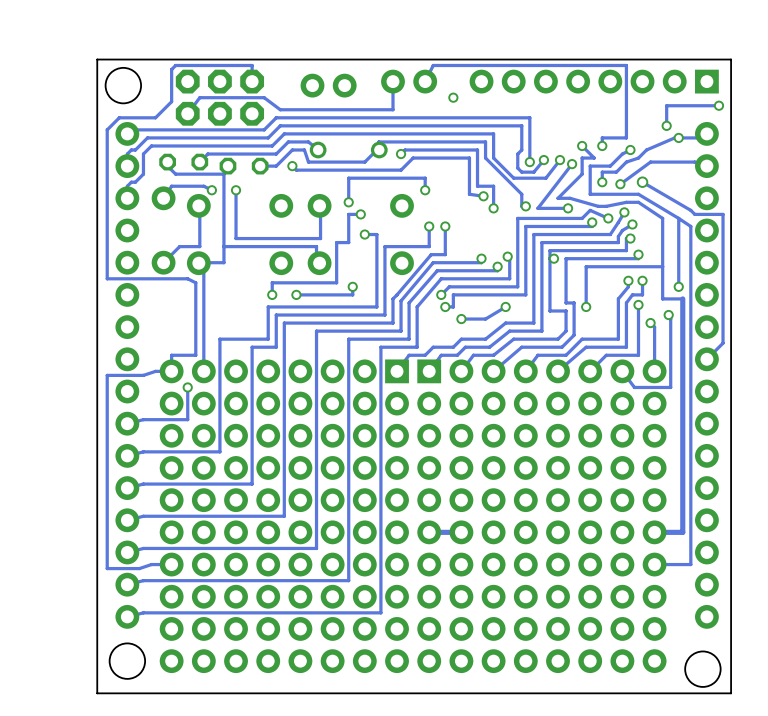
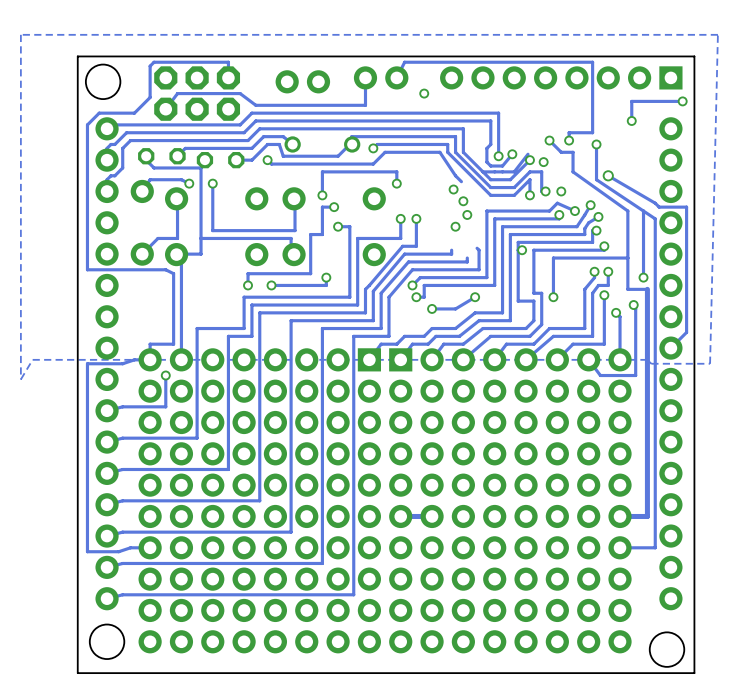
zone outline: none -> (717, 34) (20, 34) (20, 379) (32, 359) (647, 359) (651, 363) (710, 363) (717, 34)
track: (706, 133) (698, 137) (674, 137) (646, 150) (638, 158) (626, 162) (616, 172) (602, 172) (602, 182) -> none
via: (678, 137) -> none
track: (630, 150) (622, 154) (610, 166) (590, 166) (590, 194) (638, 194) (678, 218) -> (596, 144) (596, 179) (643, 211)
track: (469, 158) (469, 194) (483, 196) -> (439, 152) (461, 181)
track: (477, 158) (477, 186) (493, 186) (493, 208) -> (447, 152) (490, 195) (514, 195) (529, 179) (529, 195)
track: (594, 158) (582, 158) (582, 174) (558, 198) (570, 198) (598, 206) (638, 202) (662, 218) -> (561, 152) (573, 152) (573, 171) (627, 211)
via: (560, 160) -> none
track: (572, 164) (537, 208) (568, 208) -> none
via: (572, 164) -> none
track: none -> (529, 160) (510, 179) (490, 179) (482, 171)
via: none -> (529, 160)
track: (706, 166) (694, 162) (650, 162) (620, 184) -> none
via: none -> (543, 162)
via: (602, 182) -> none
via: (620, 184) -> none
track: (521, 194) (521, 206) (525, 206) -> (490, 187) (514, 187) (529, 171) (541, 171) (541, 191) (545, 191)
via: none -> (545, 191)
via: none -> (561, 191)
via: none -> (529, 195)
via: (525, 206) -> none
via: (568, 208) -> none
via: none -> (467, 214)
via: none -> (455, 226)
via: (507, 256) -> none
via: (481, 258) -> none
via: (497, 266) -> none

